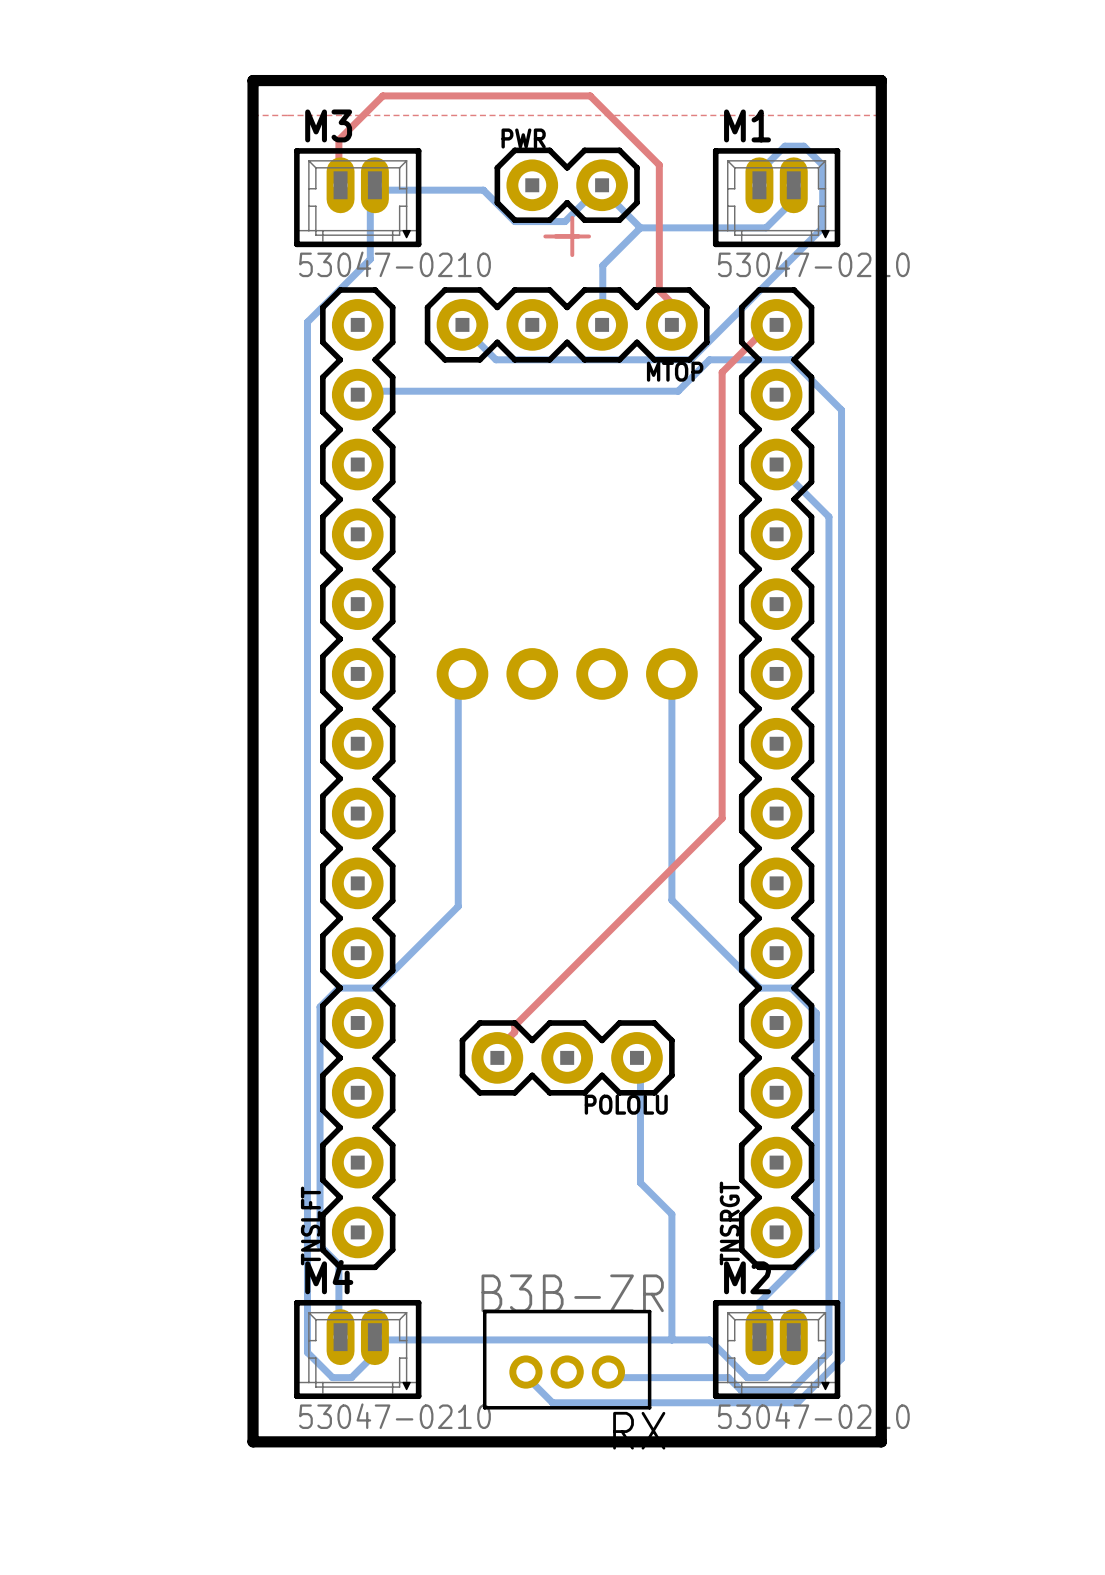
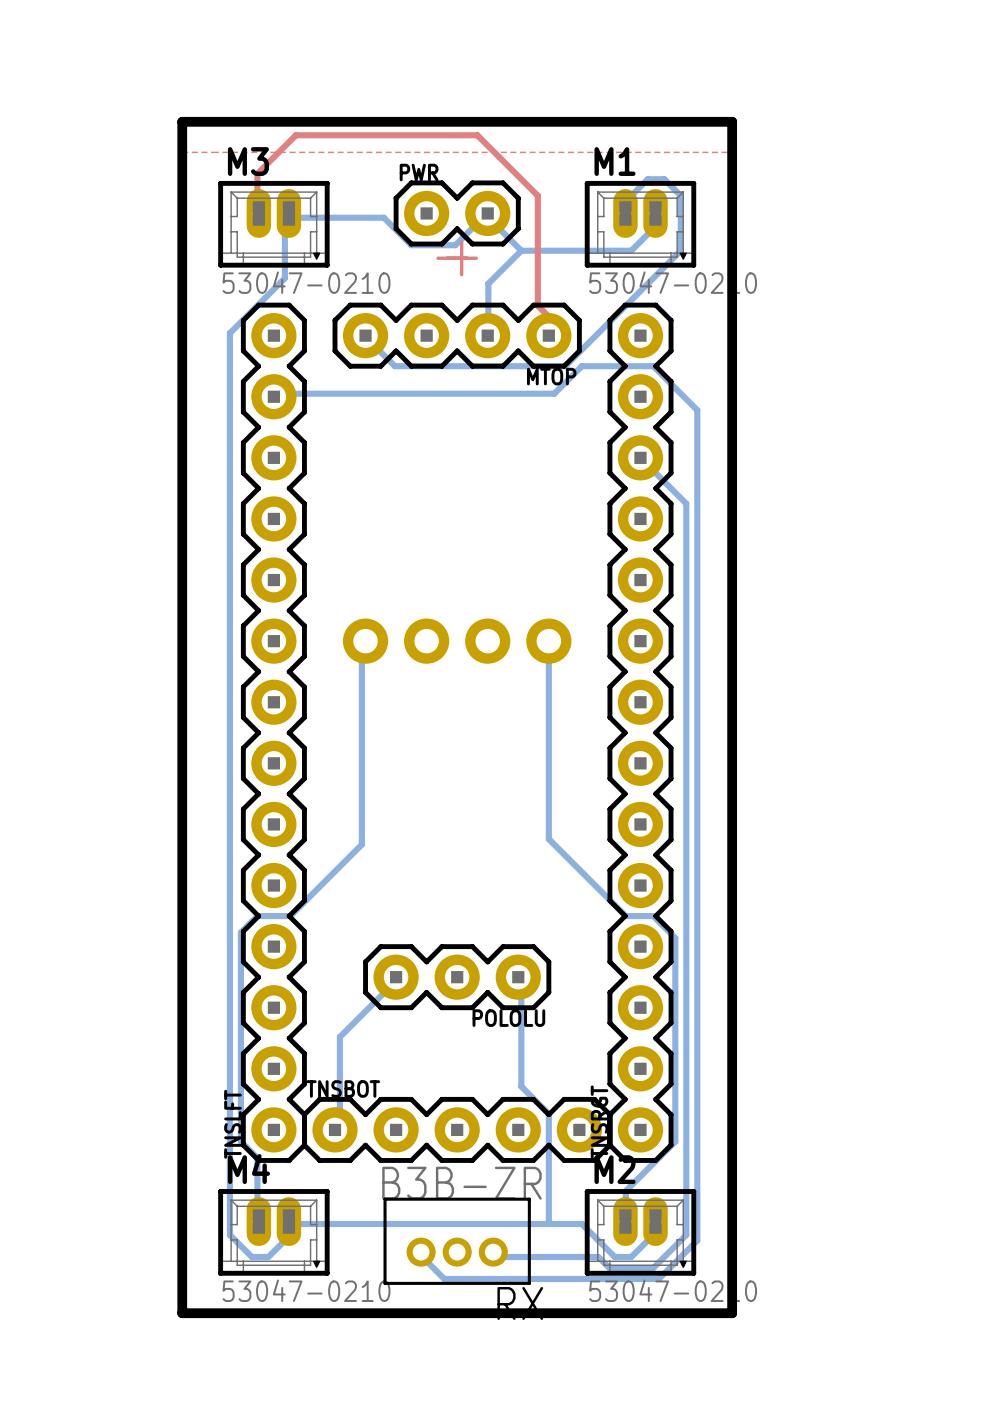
top track: (776, 324) (772, 322) (722, 372) (722, 818) (514, 1025) (514, 1032) (502, 1044) (502, 1057) (497, 1057) -> none
bottom track: none -> (396, 977) (394, 982) (339, 1037) (339, 1125) (335, 1129)
TNSBOT: none -> (457, 1129)

